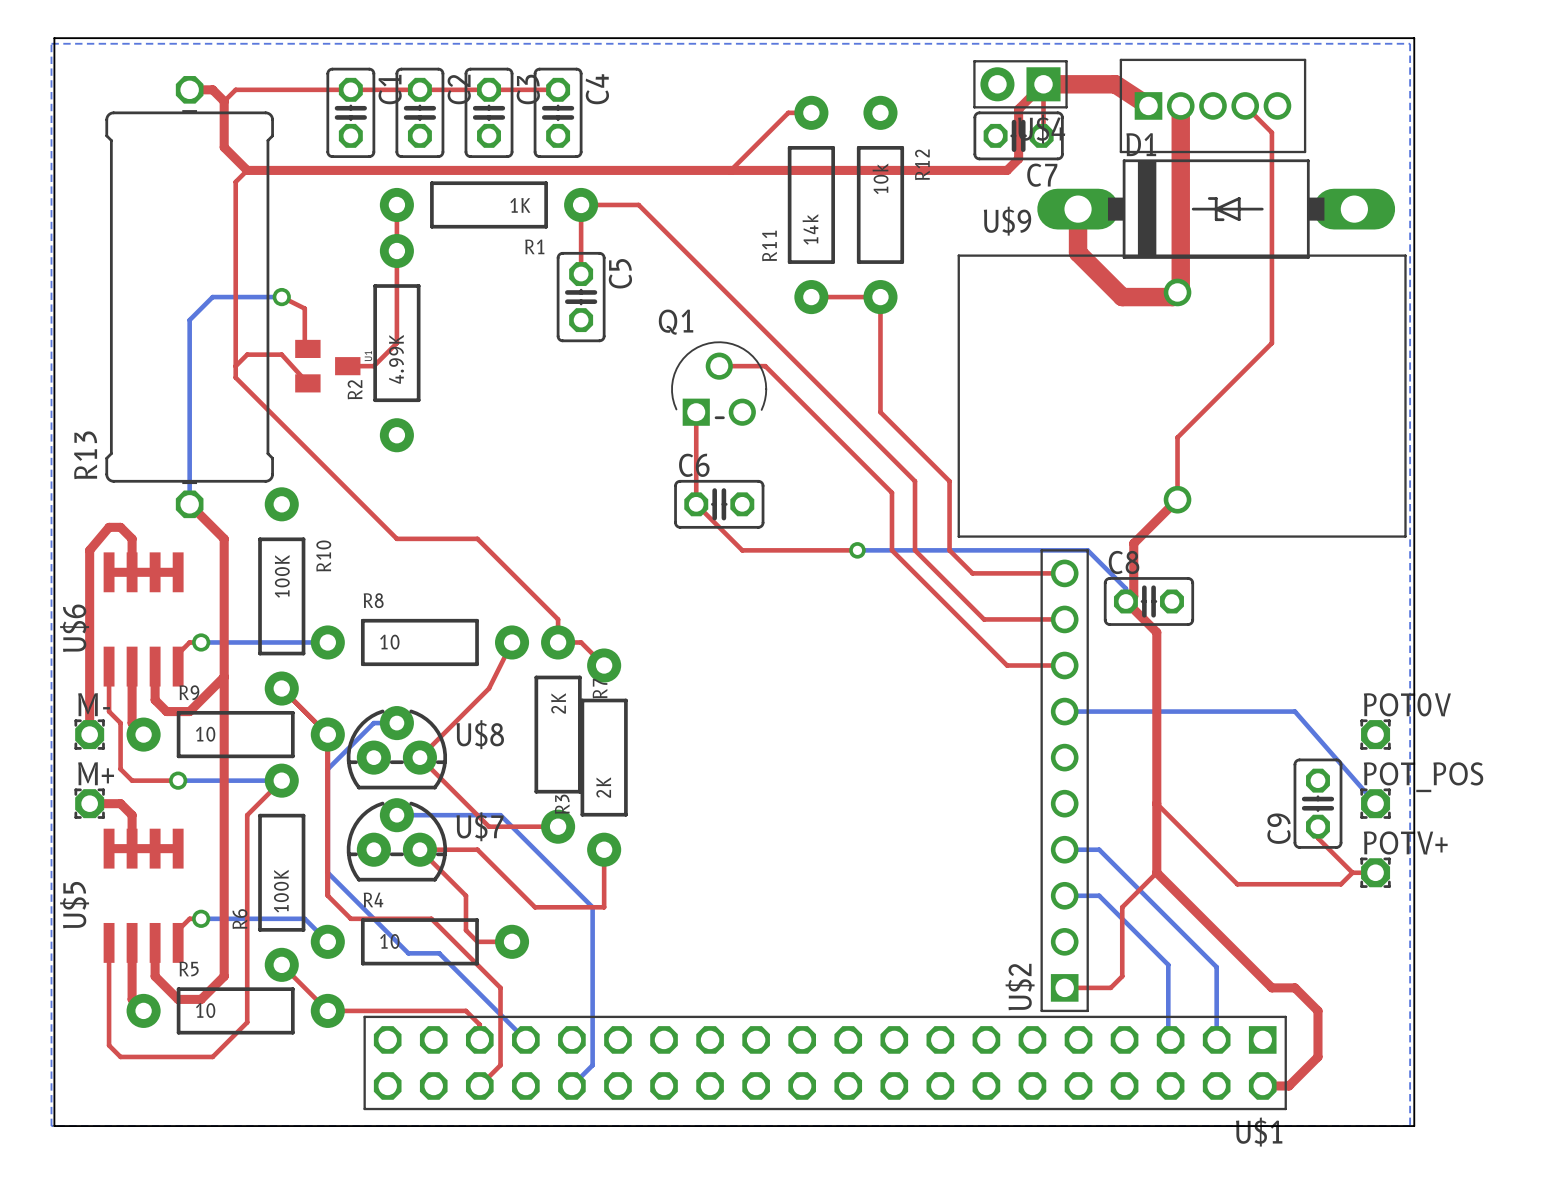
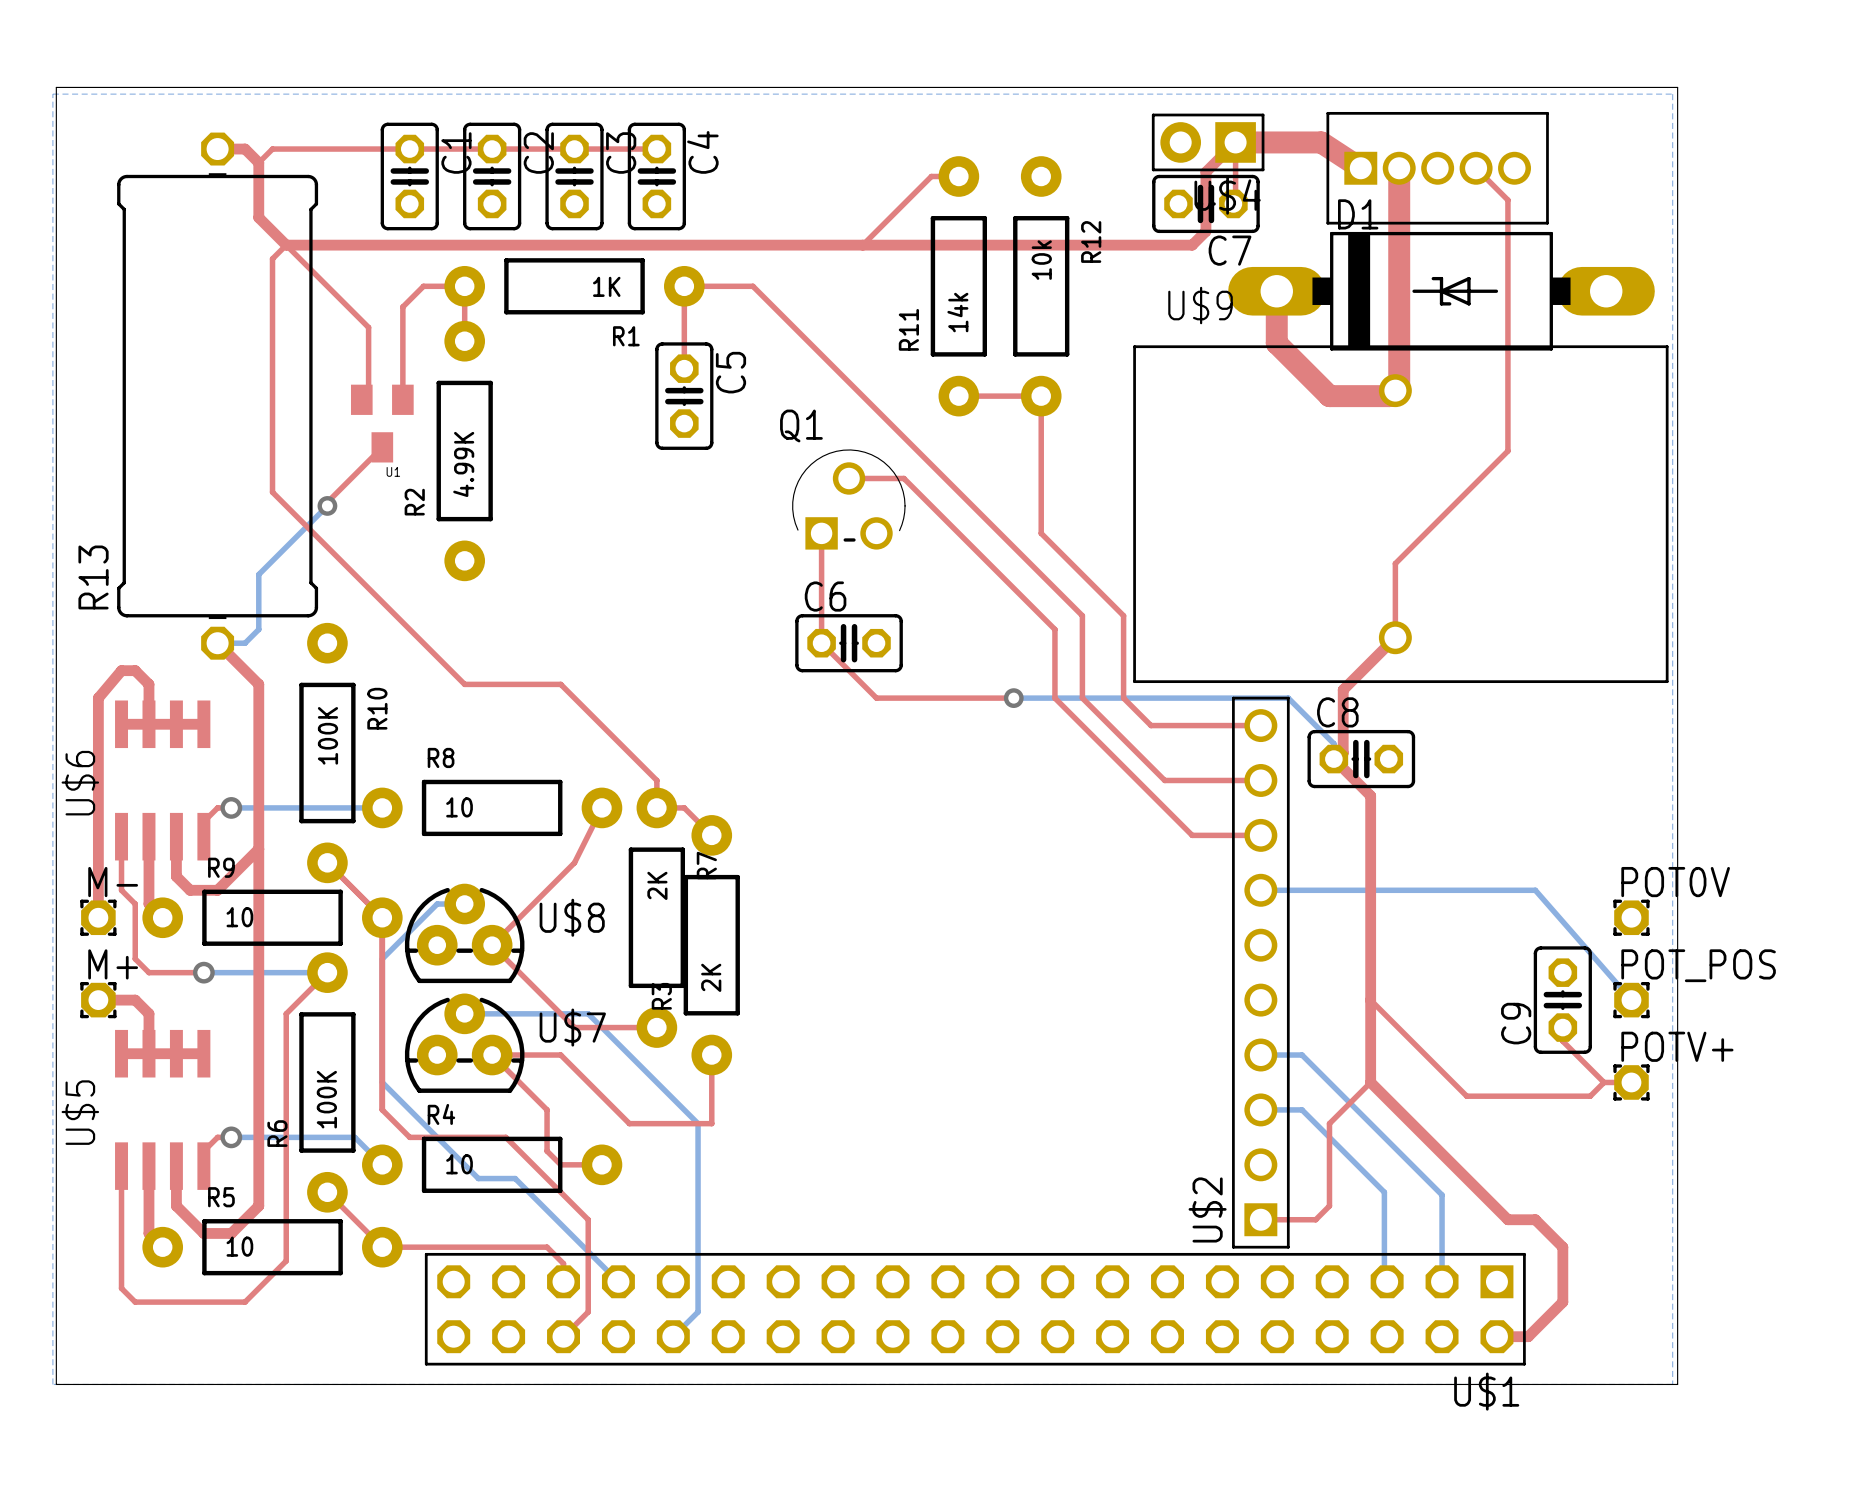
top track: none -> (286, 245) (368, 327) (368, 392) (361, 399)
top track: none -> (464, 286) (423, 286) (402, 306) (402, 399)
top track: (396, 251) (396, 343) (373, 366) (347, 366) -> none
top track: (281, 297) (304, 308) (304, 343) (307, 348) -> none
bottom track: (281, 297) (212, 297) (189, 320) (189, 504) -> (327, 505) (258, 574) (258, 629) (245, 643) (217, 643)
via: (281, 297) -> none
top track: none -> (382, 447) (327, 502) (327, 505)
top track: (235, 366) (247, 354) (281, 354) (307, 383) -> none
U1 rotation: 0° (327, 366) -> 90° clockwise (382, 423)
U1 position: (327, 366) -> (382, 423)
via: none -> (327, 505)

